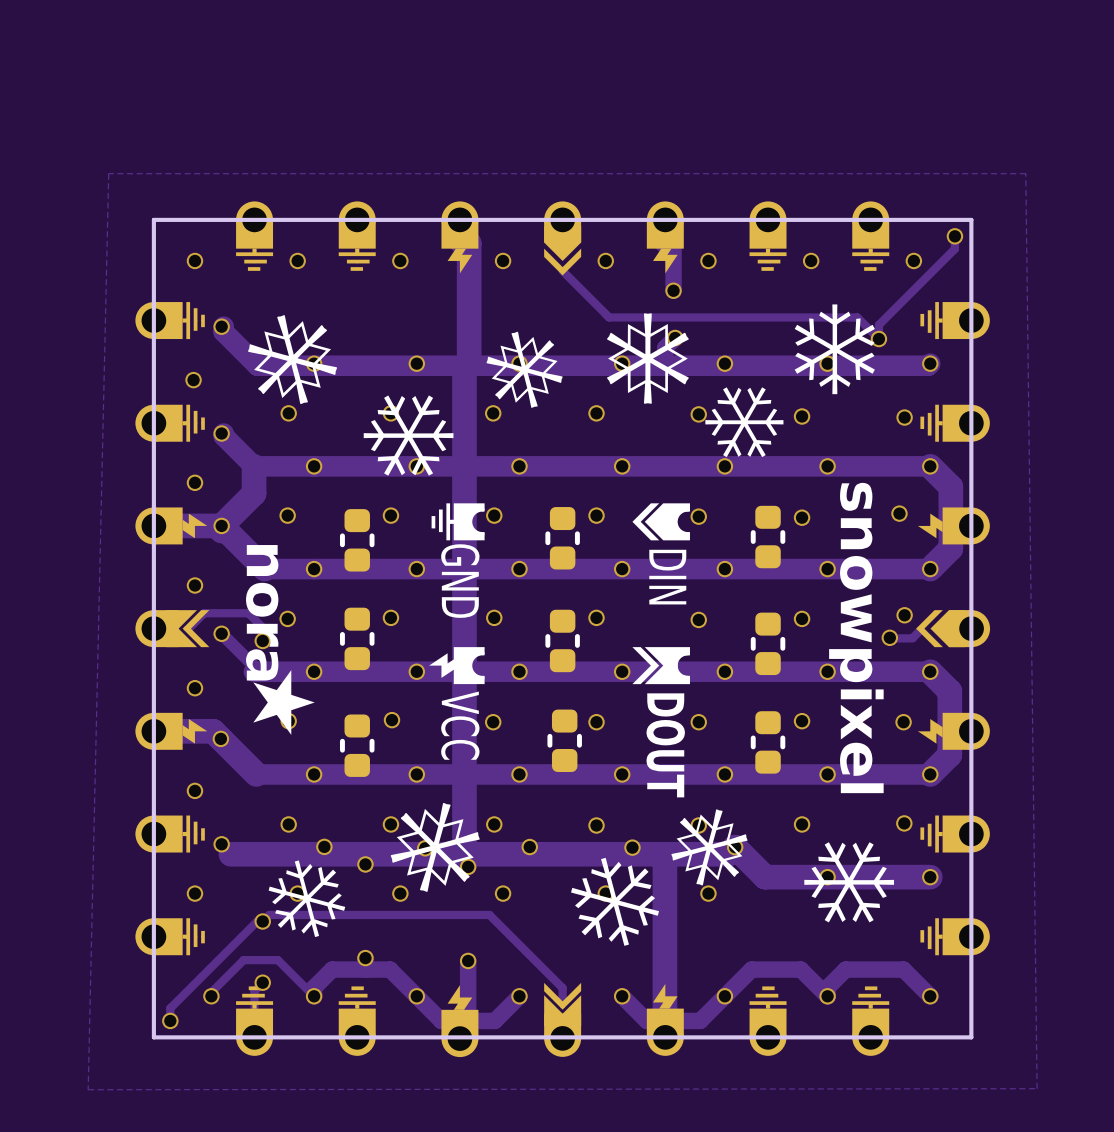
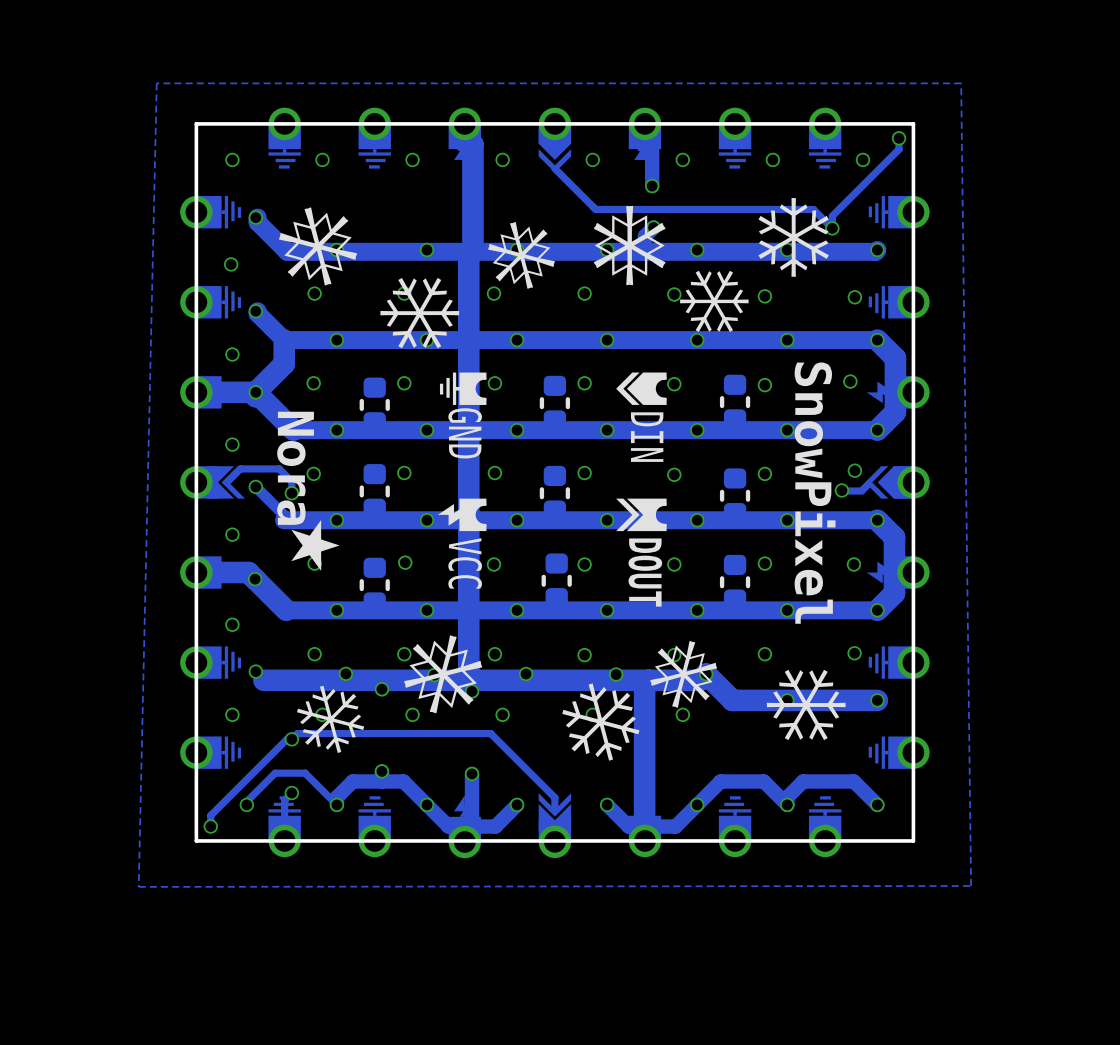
text: nora (262, 612) -> Nora (295, 468)
text: snowpixel (856, 637) -> SnowPixel (815, 493)

